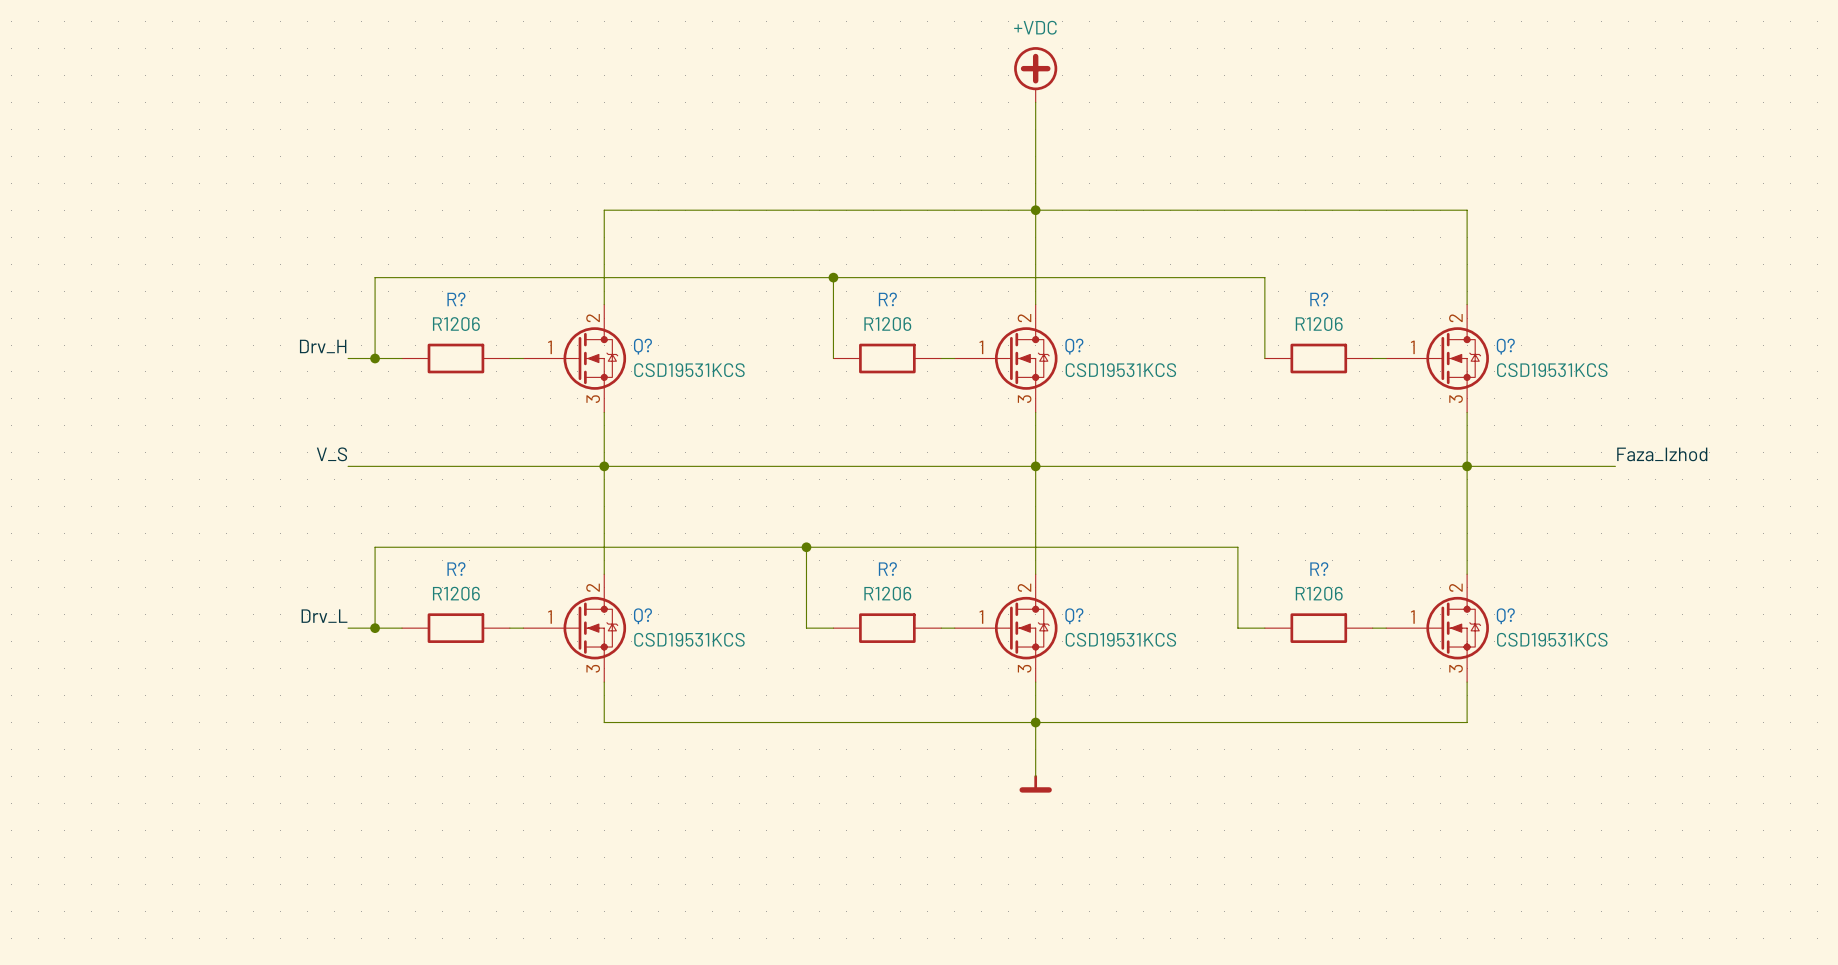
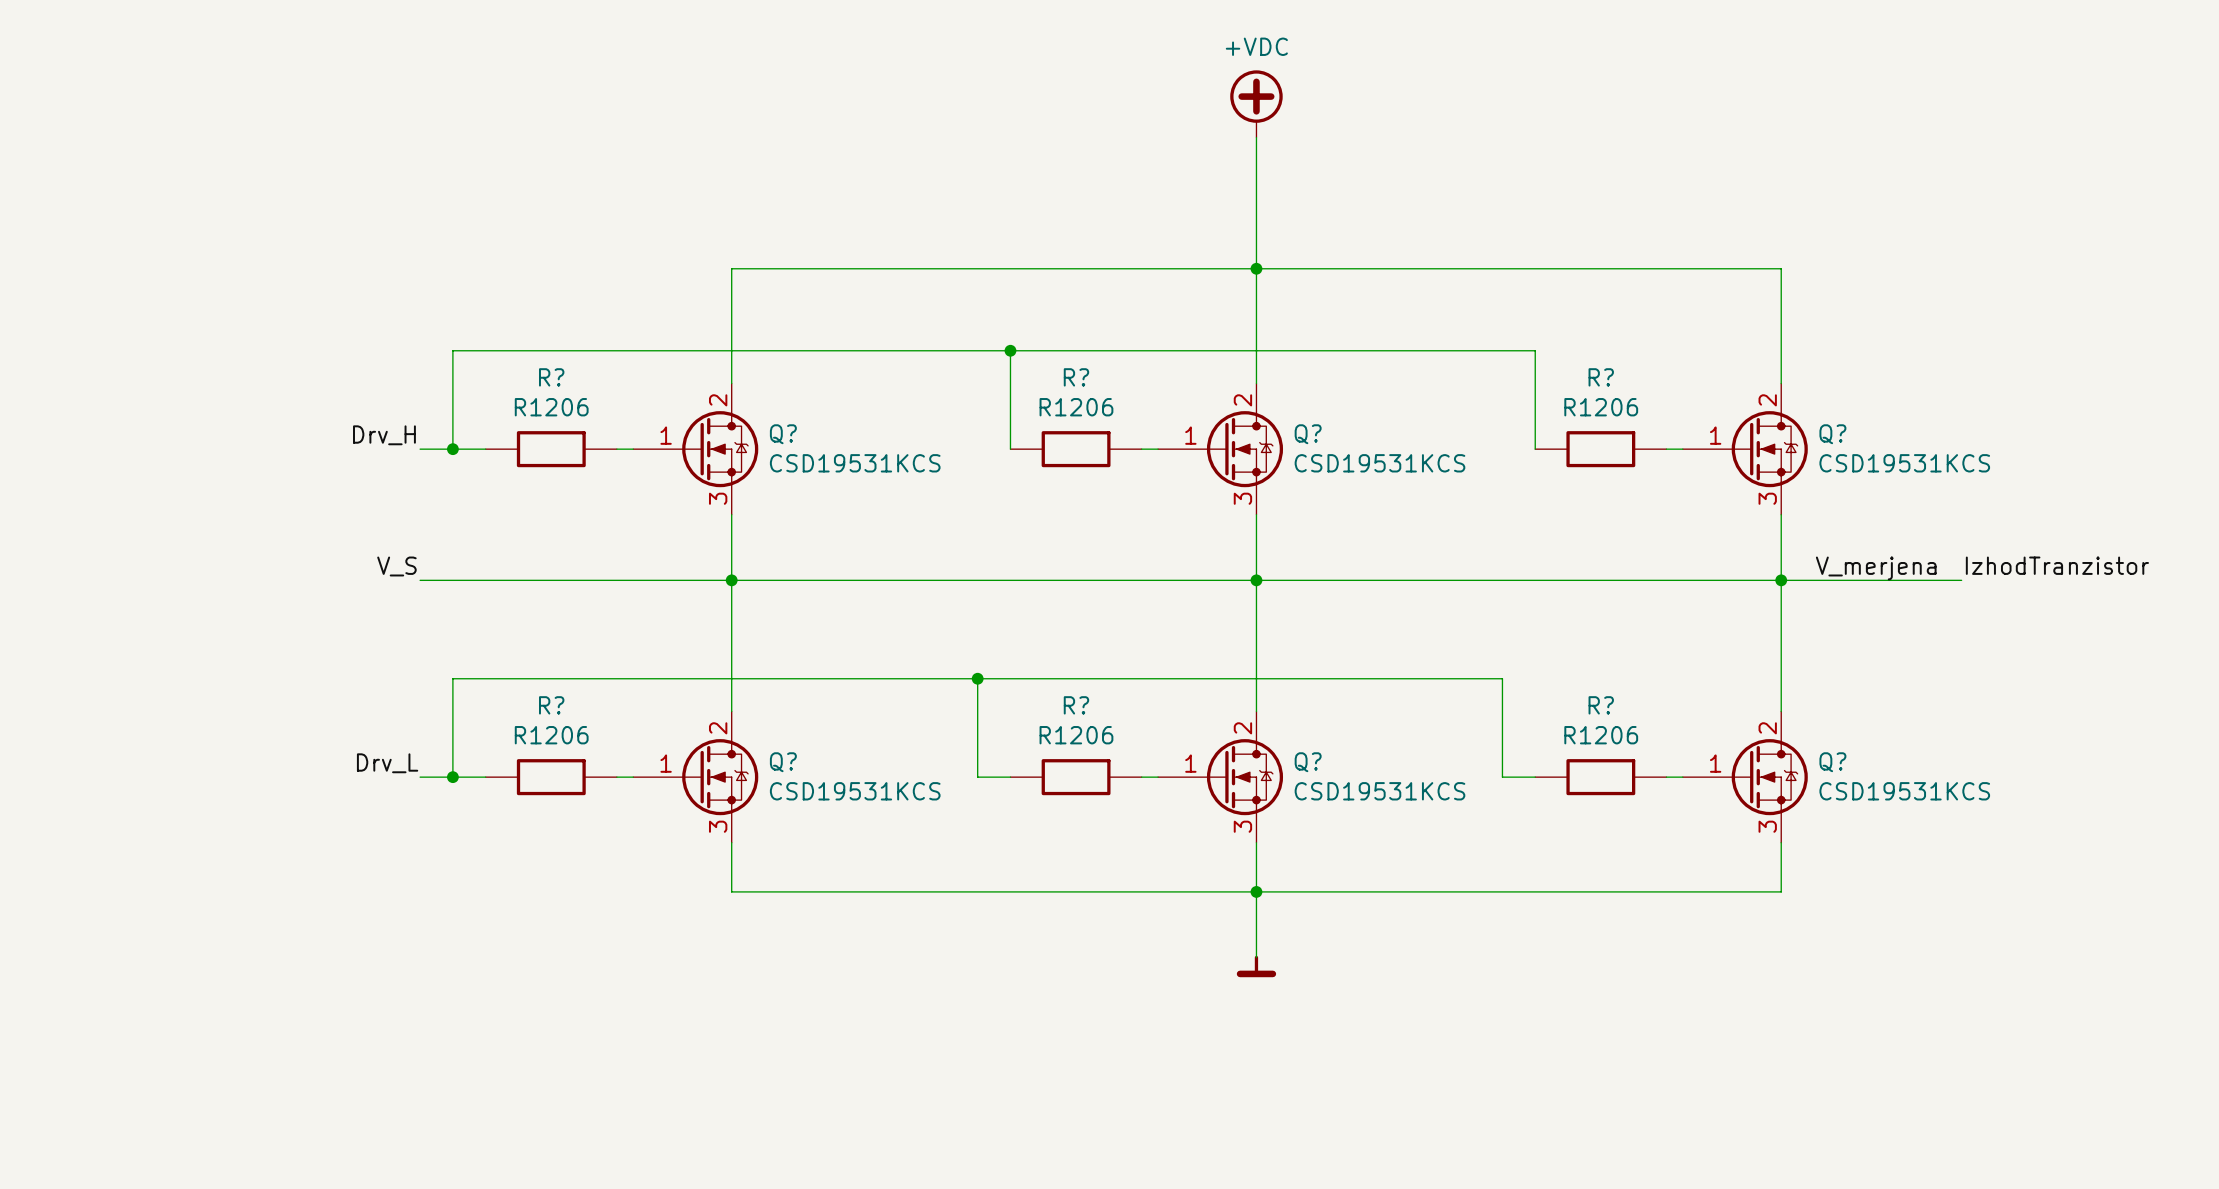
label: Faza_Izhod (1662, 454) -> IzhodTranzistor (2057, 565)
label: none -> V_merjena (1876, 568)

